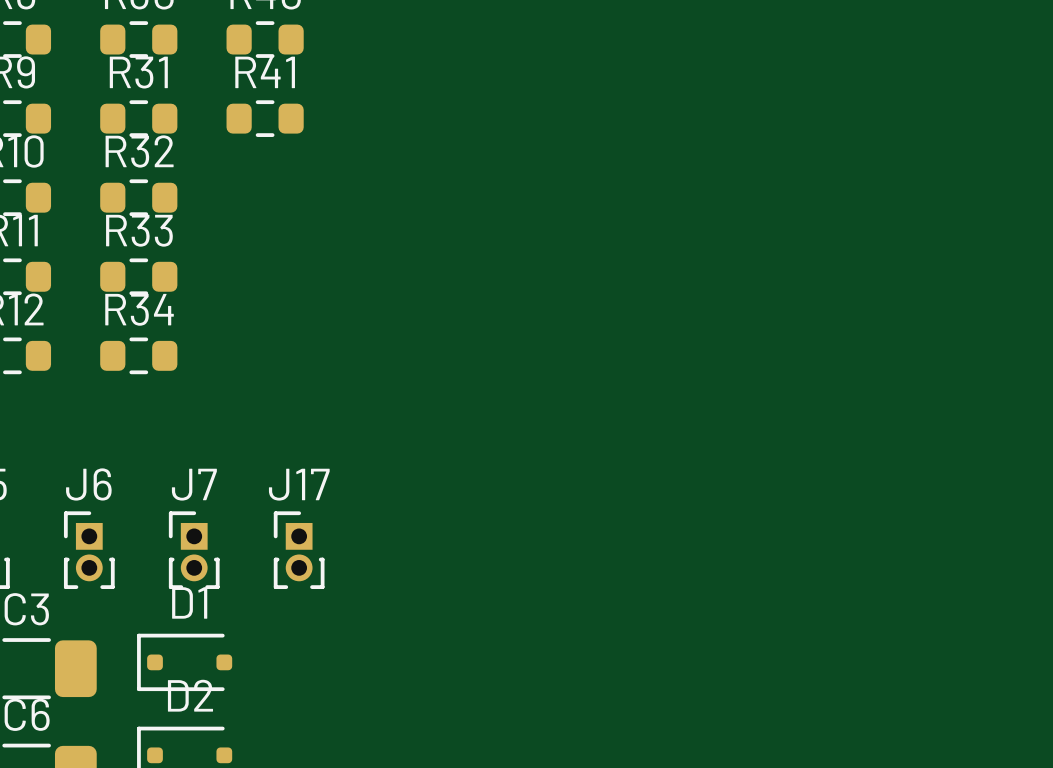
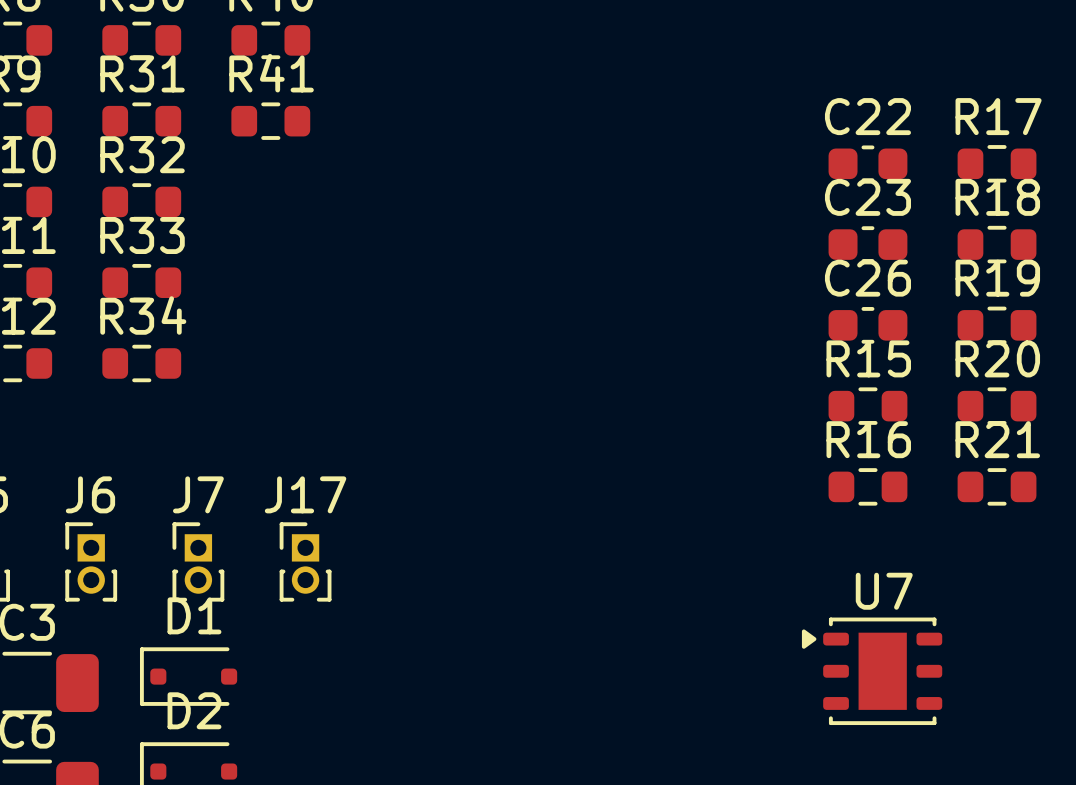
C22: none -> (867, 163)
R17: none -> (997, 163)
C23: none -> (867, 244)
R18: none -> (997, 244)
C26: none -> (867, 325)
R19: none -> (997, 325)
R15: none -> (867, 406)
R20: none -> (997, 406)
R16: none -> (867, 486)
R21: none -> (997, 486)
U7: none -> (872, 671)

